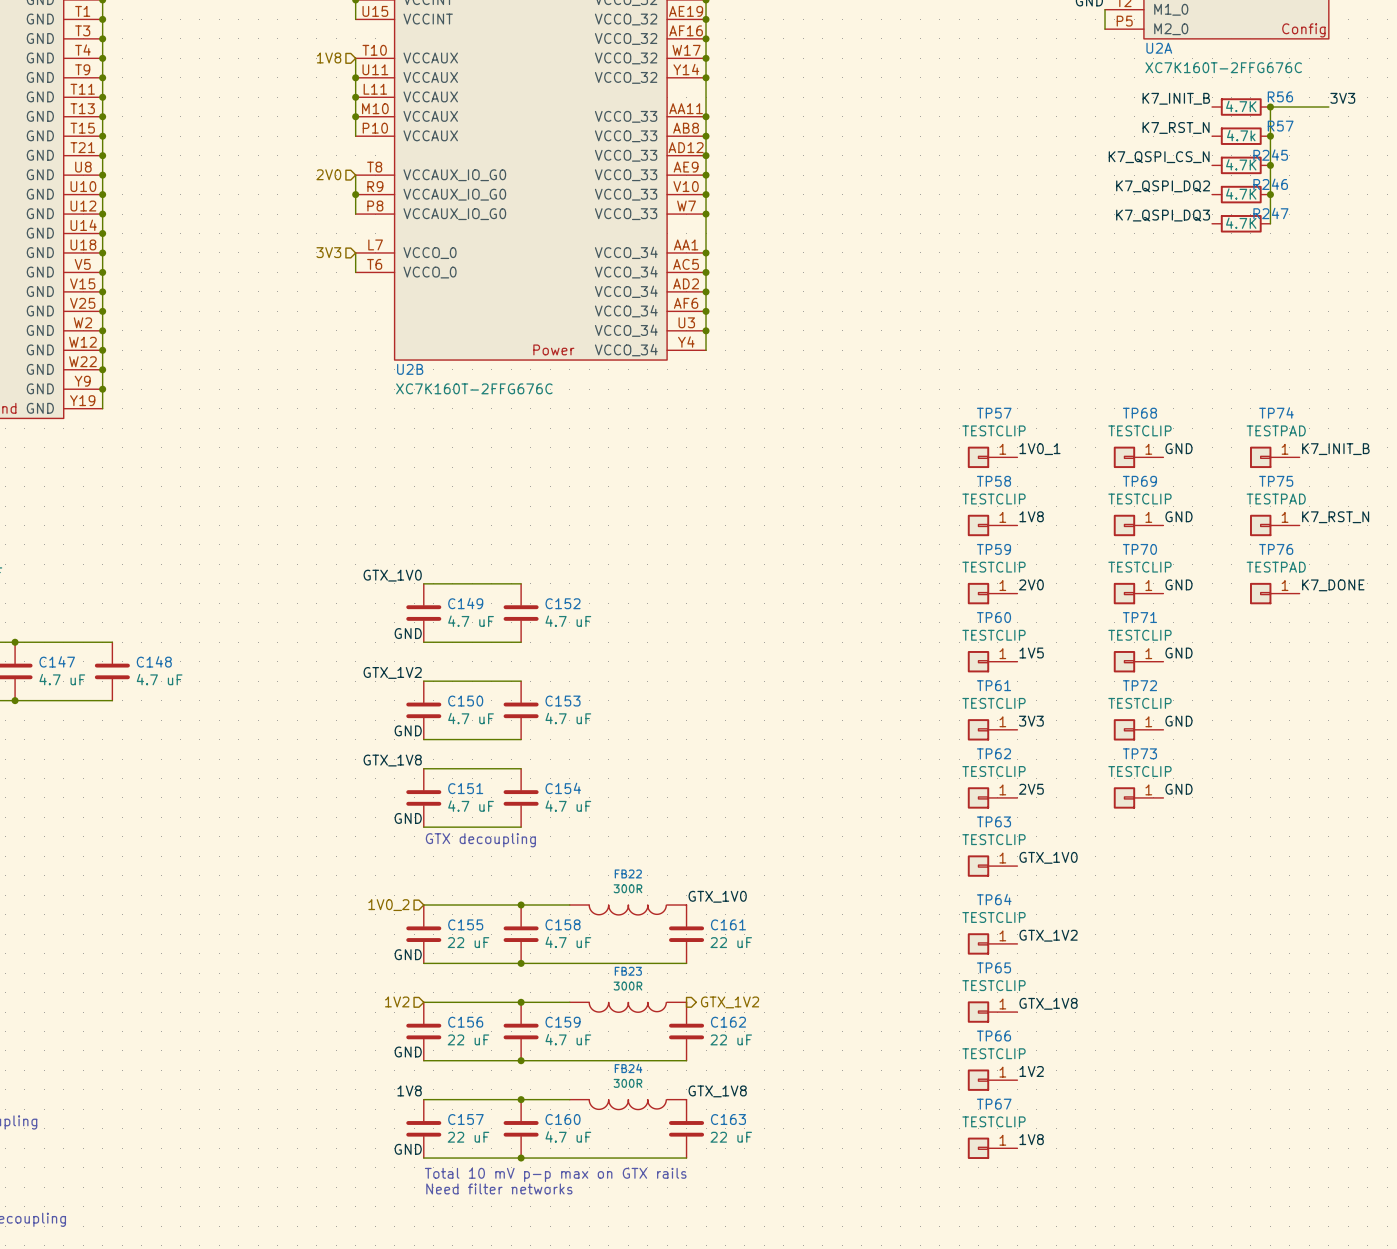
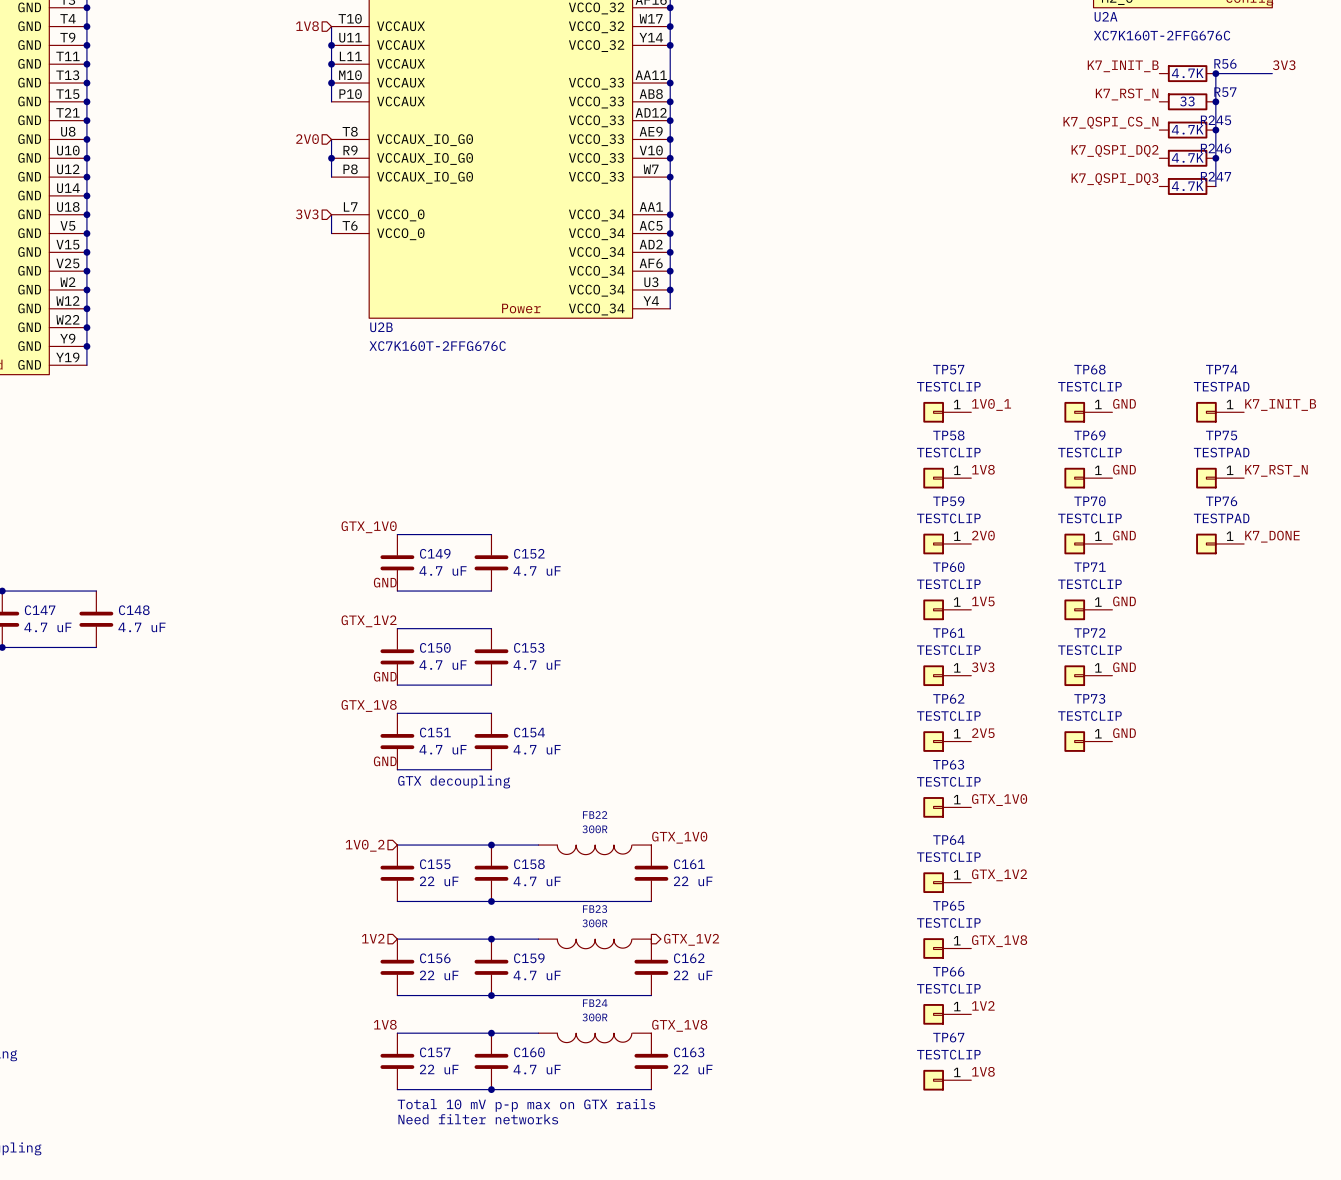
R57 value: 4.7k (1241, 135) -> 33 (1187, 101)
label: GND (408, 954) -> none
label: GND (408, 1052) -> none
label: GND (408, 1149) -> none

